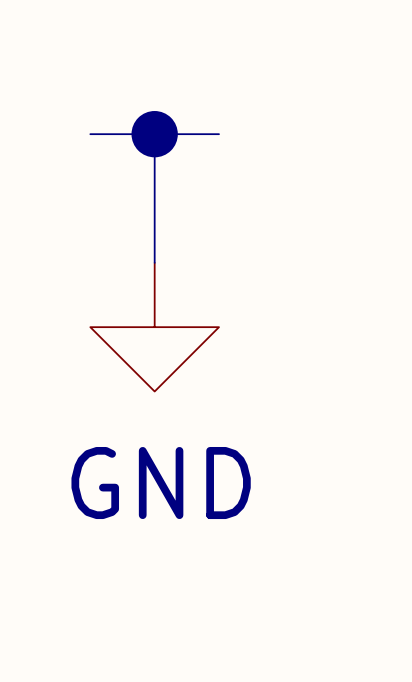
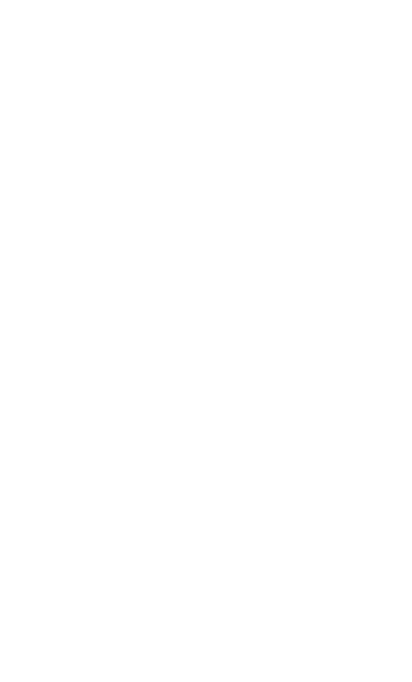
wire: (90, 134) (219, 134) -> none
wire: (154, 134) (154, 262) -> none
junction: (154, 134) -> none
power symbol: GND (154, 327) -> none

